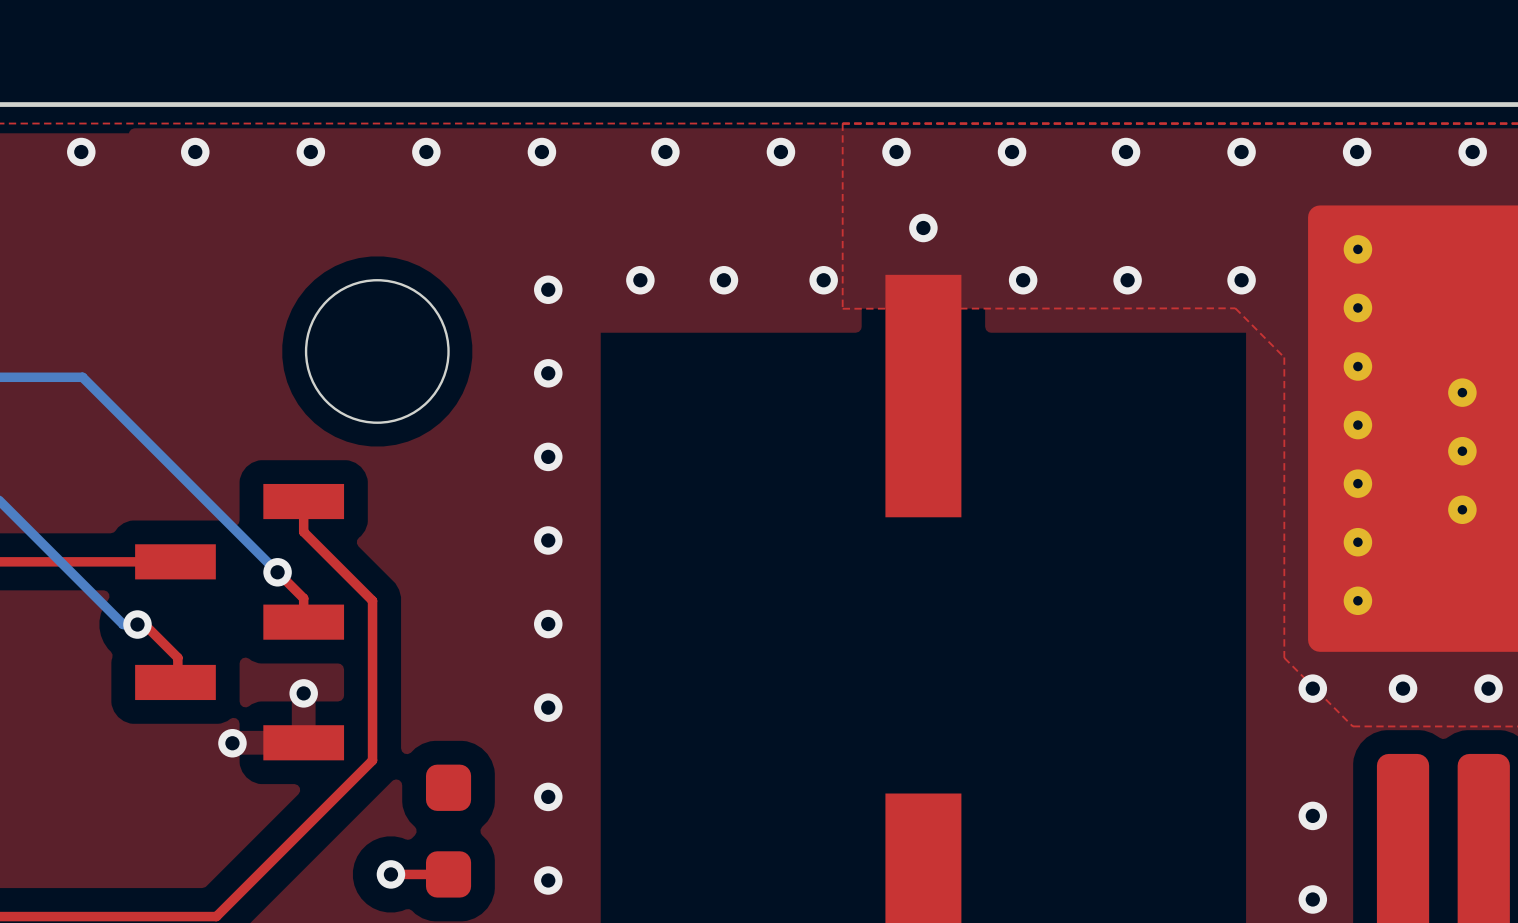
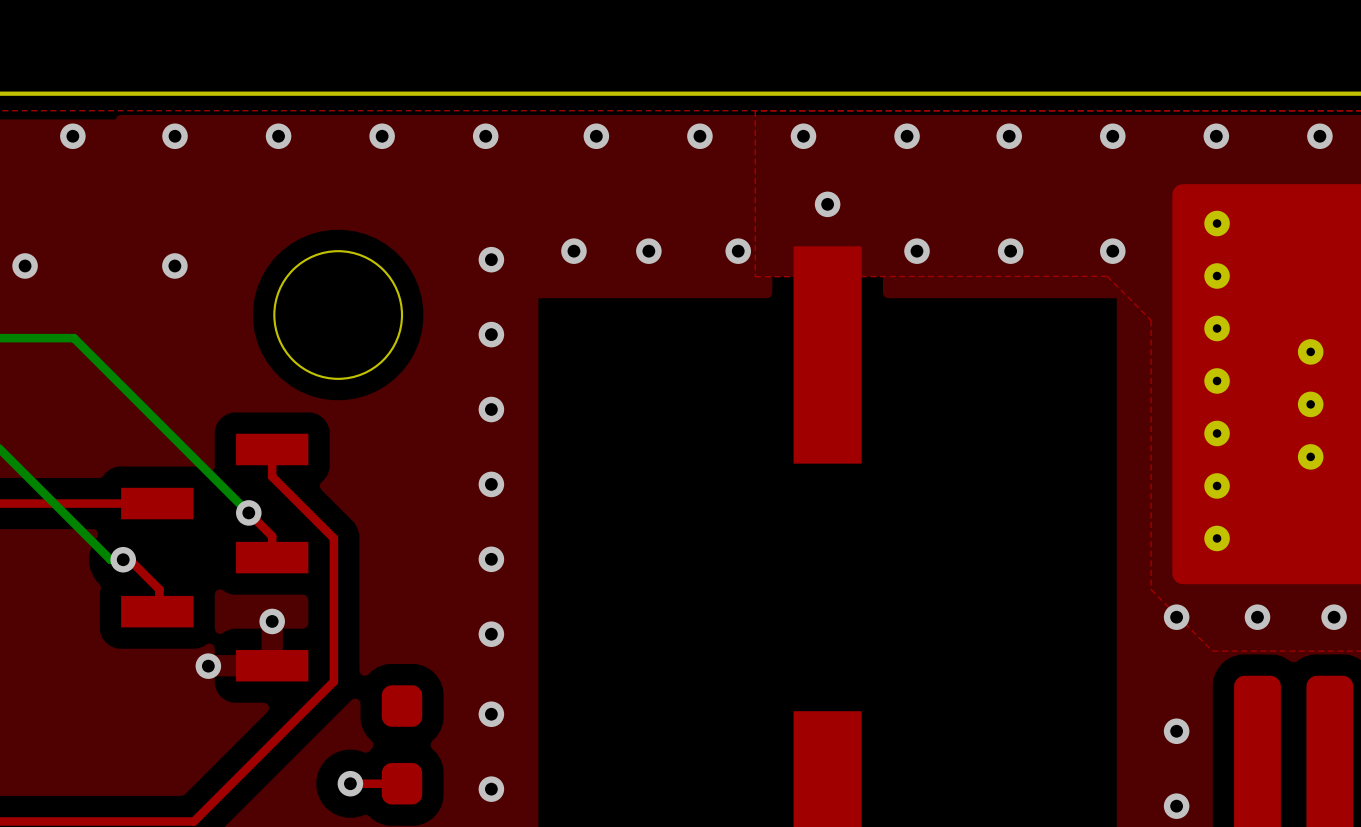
via: none -> (25, 265)
via: none -> (174, 265)

